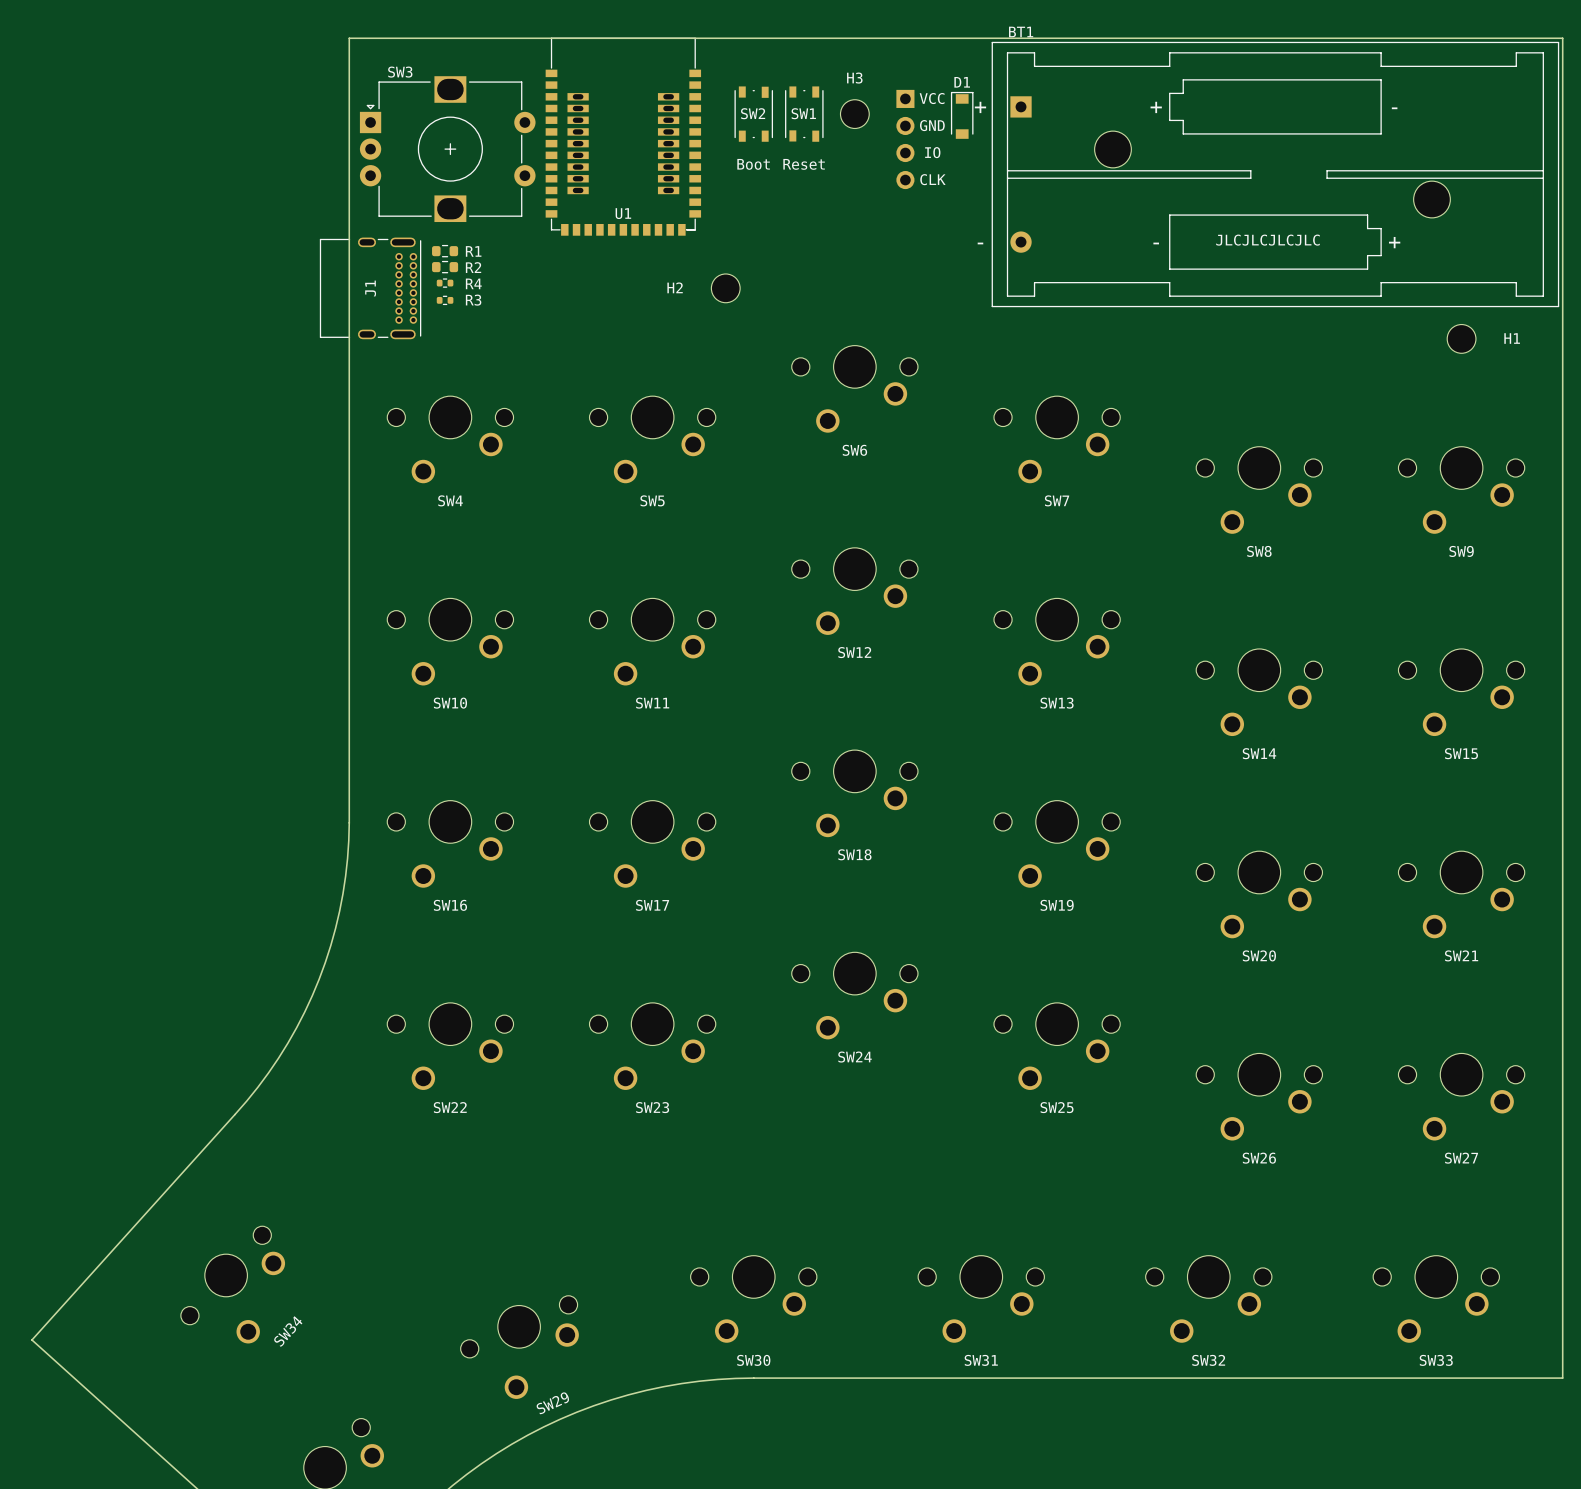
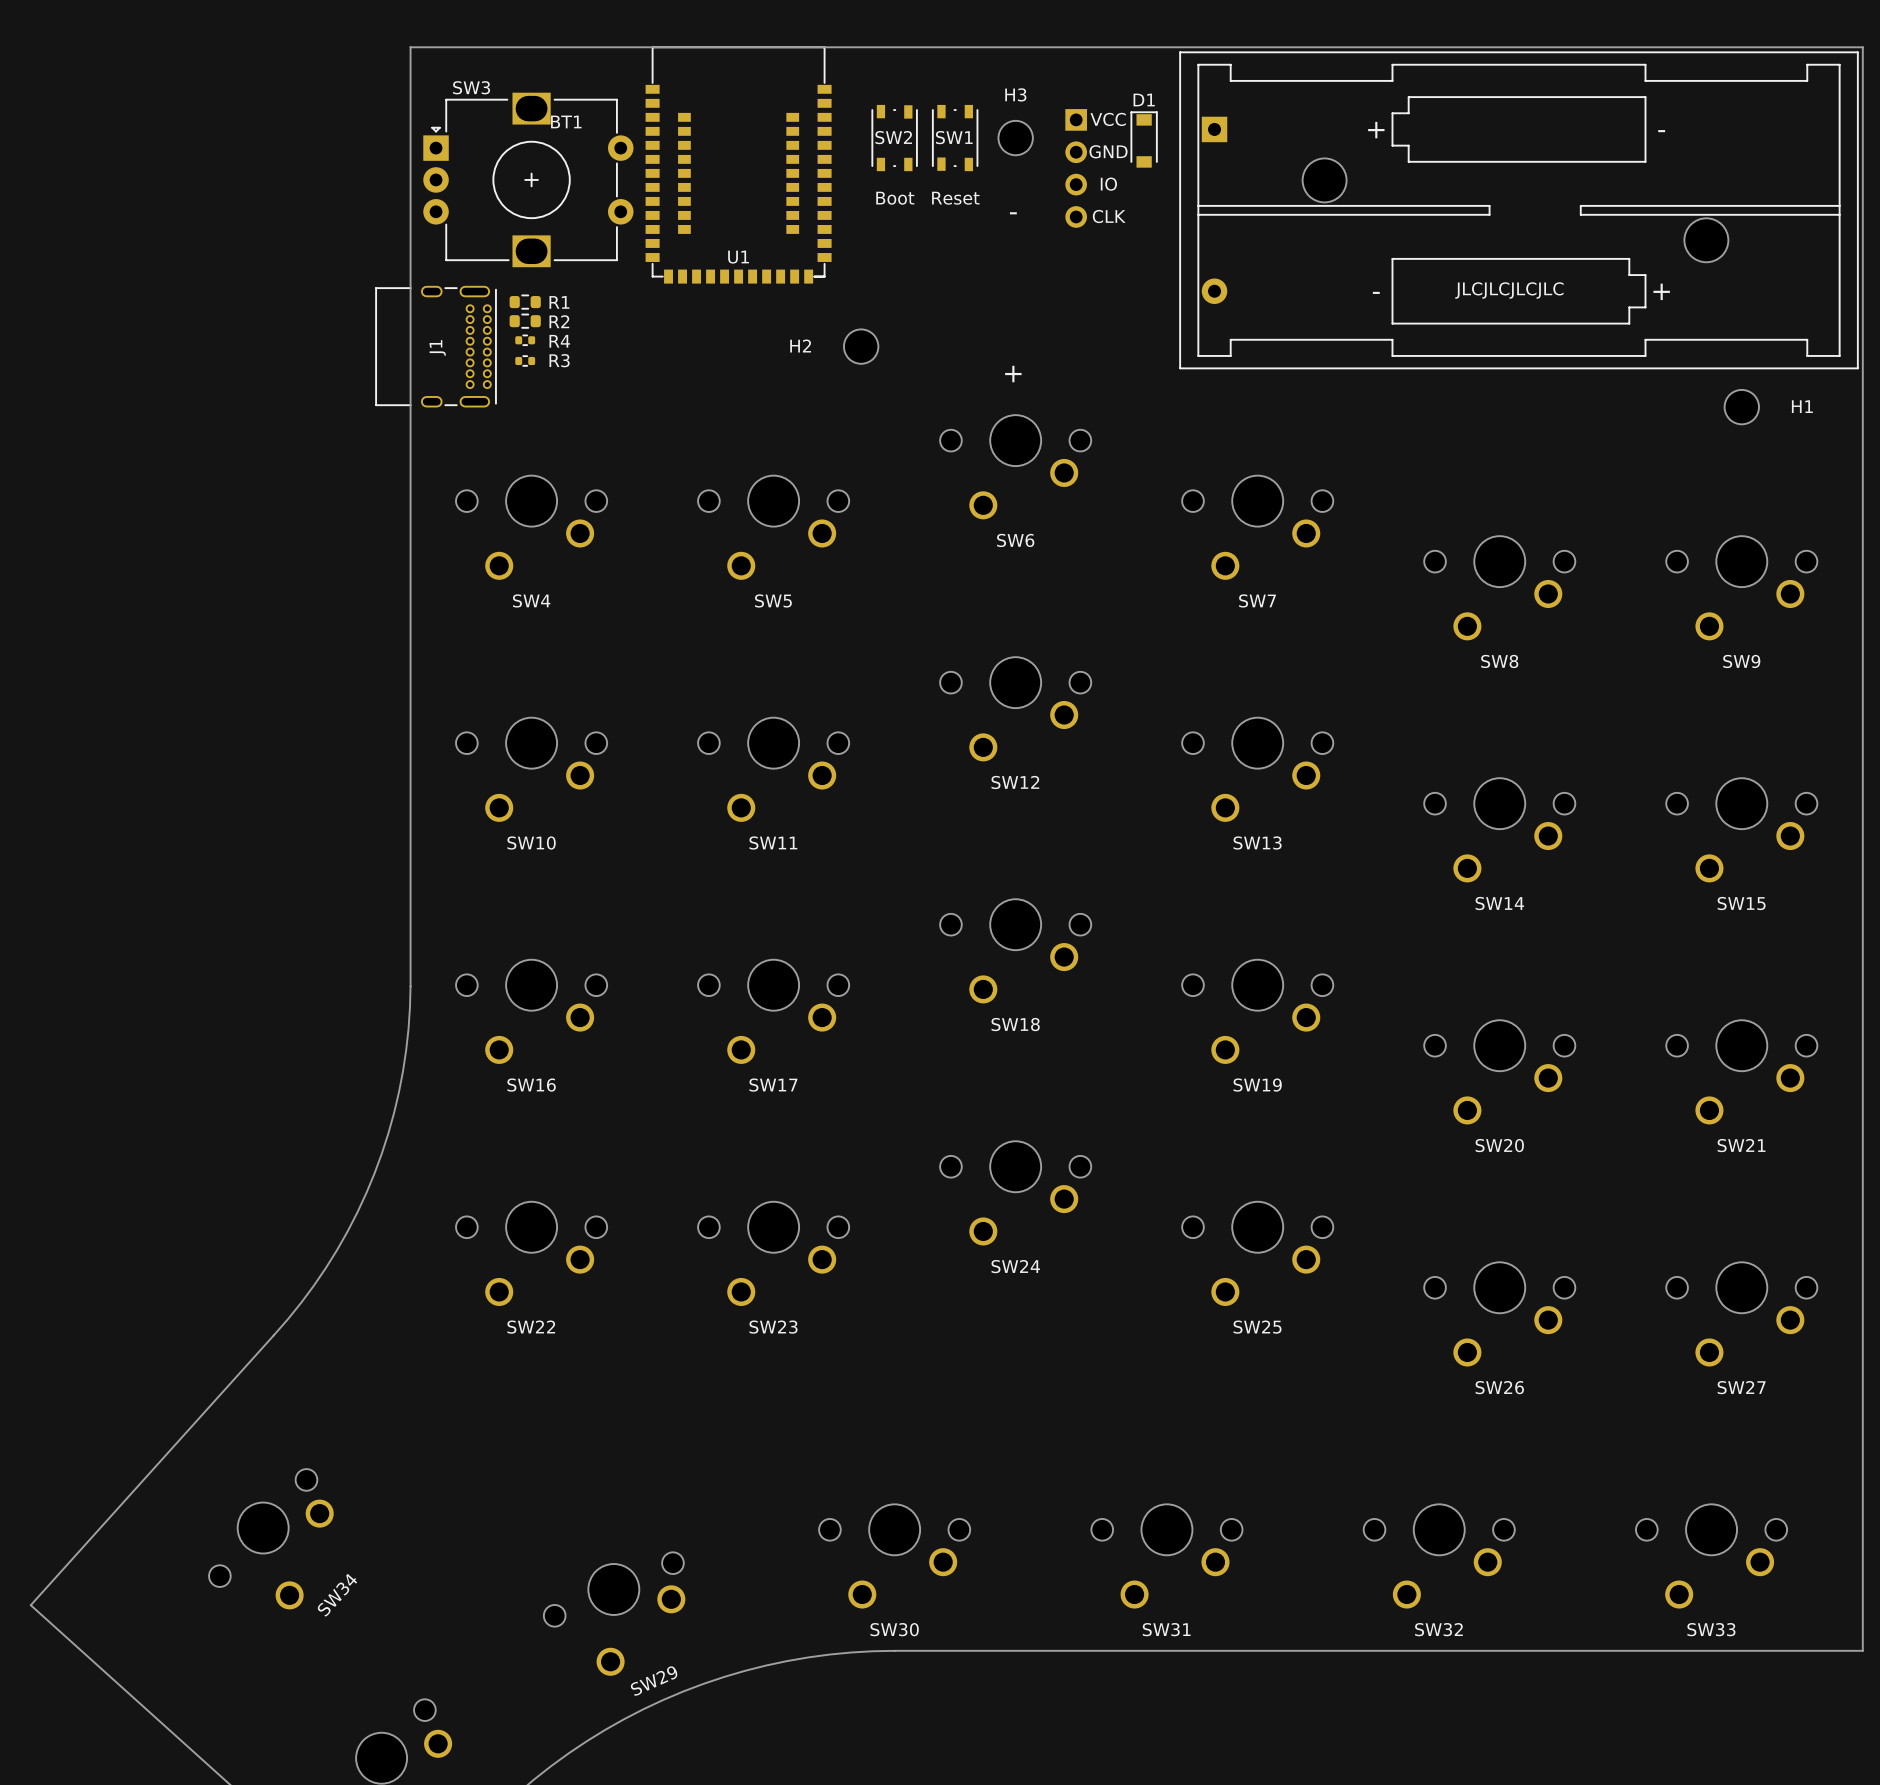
BT1 name position: BT1 (1021, 32) -> BT1 (566, 121)
U1 footprint: [545, 37, 702, 236] -> [645, 46, 832, 284]
BT1 text position: + (980, 107) -> + (1013, 374)
BT1 text position: - (980, 243) -> - (1013, 213)

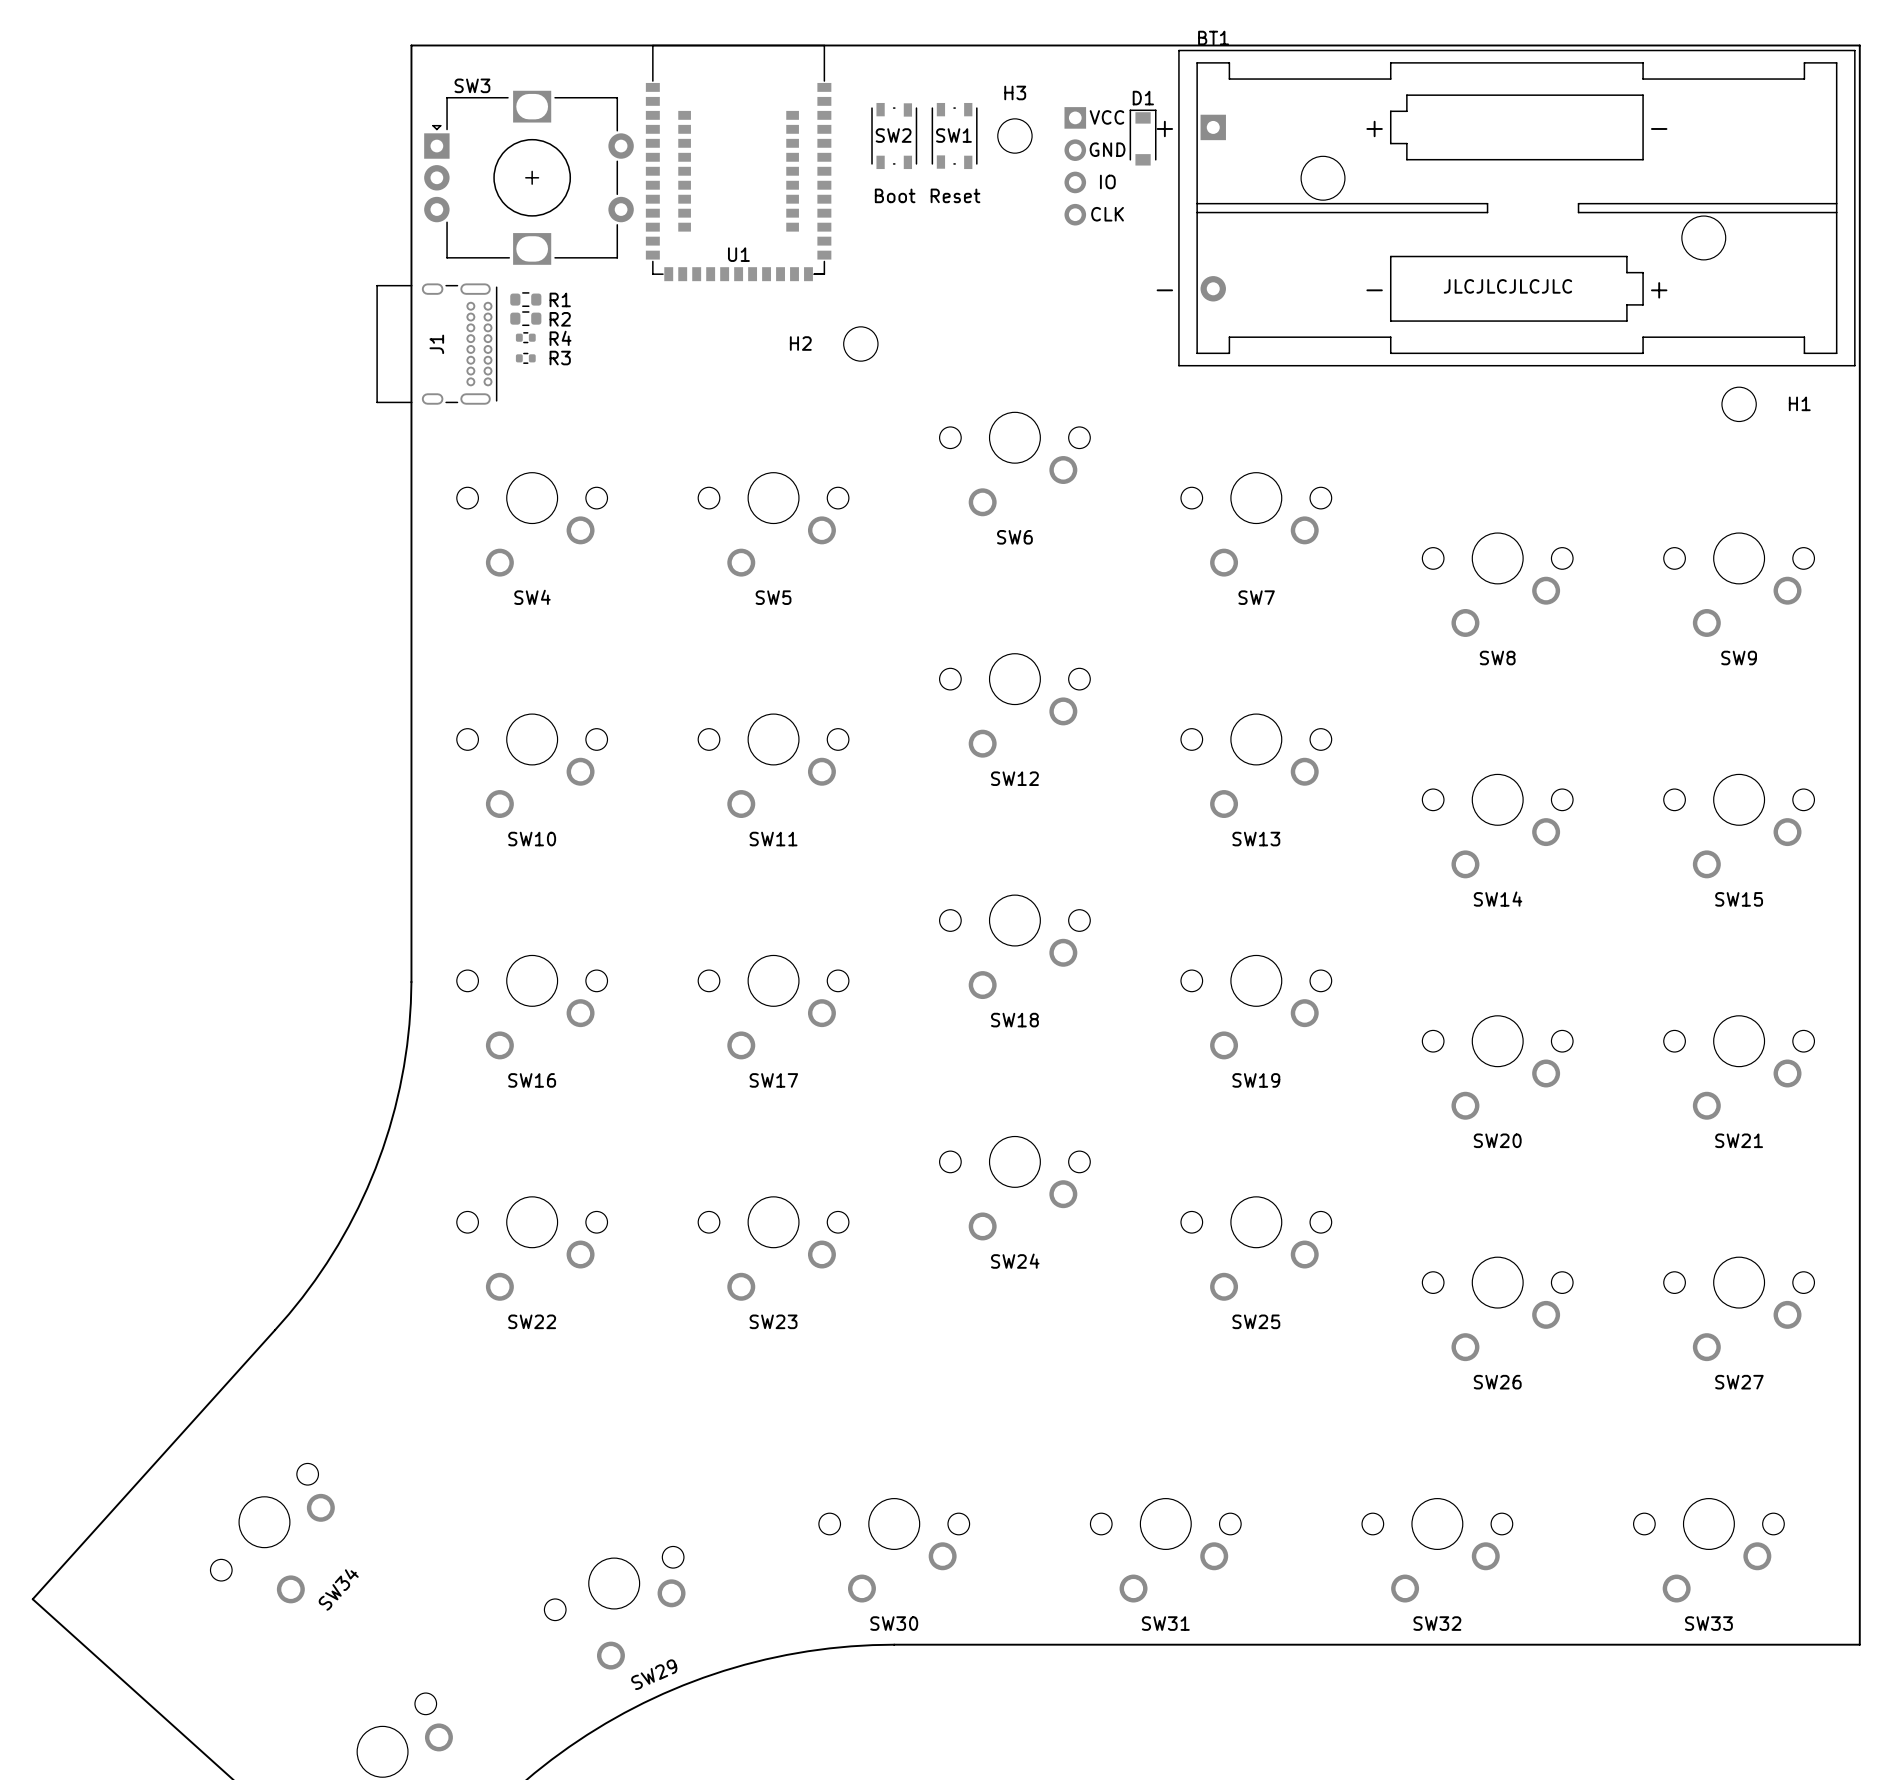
BT1 name position: BT1 (566, 121) -> BT1 (1213, 38)
BT1 text position: - (1013, 213) -> - (1164, 290)
BT1 text position: + (1013, 374) -> + (1164, 128)

